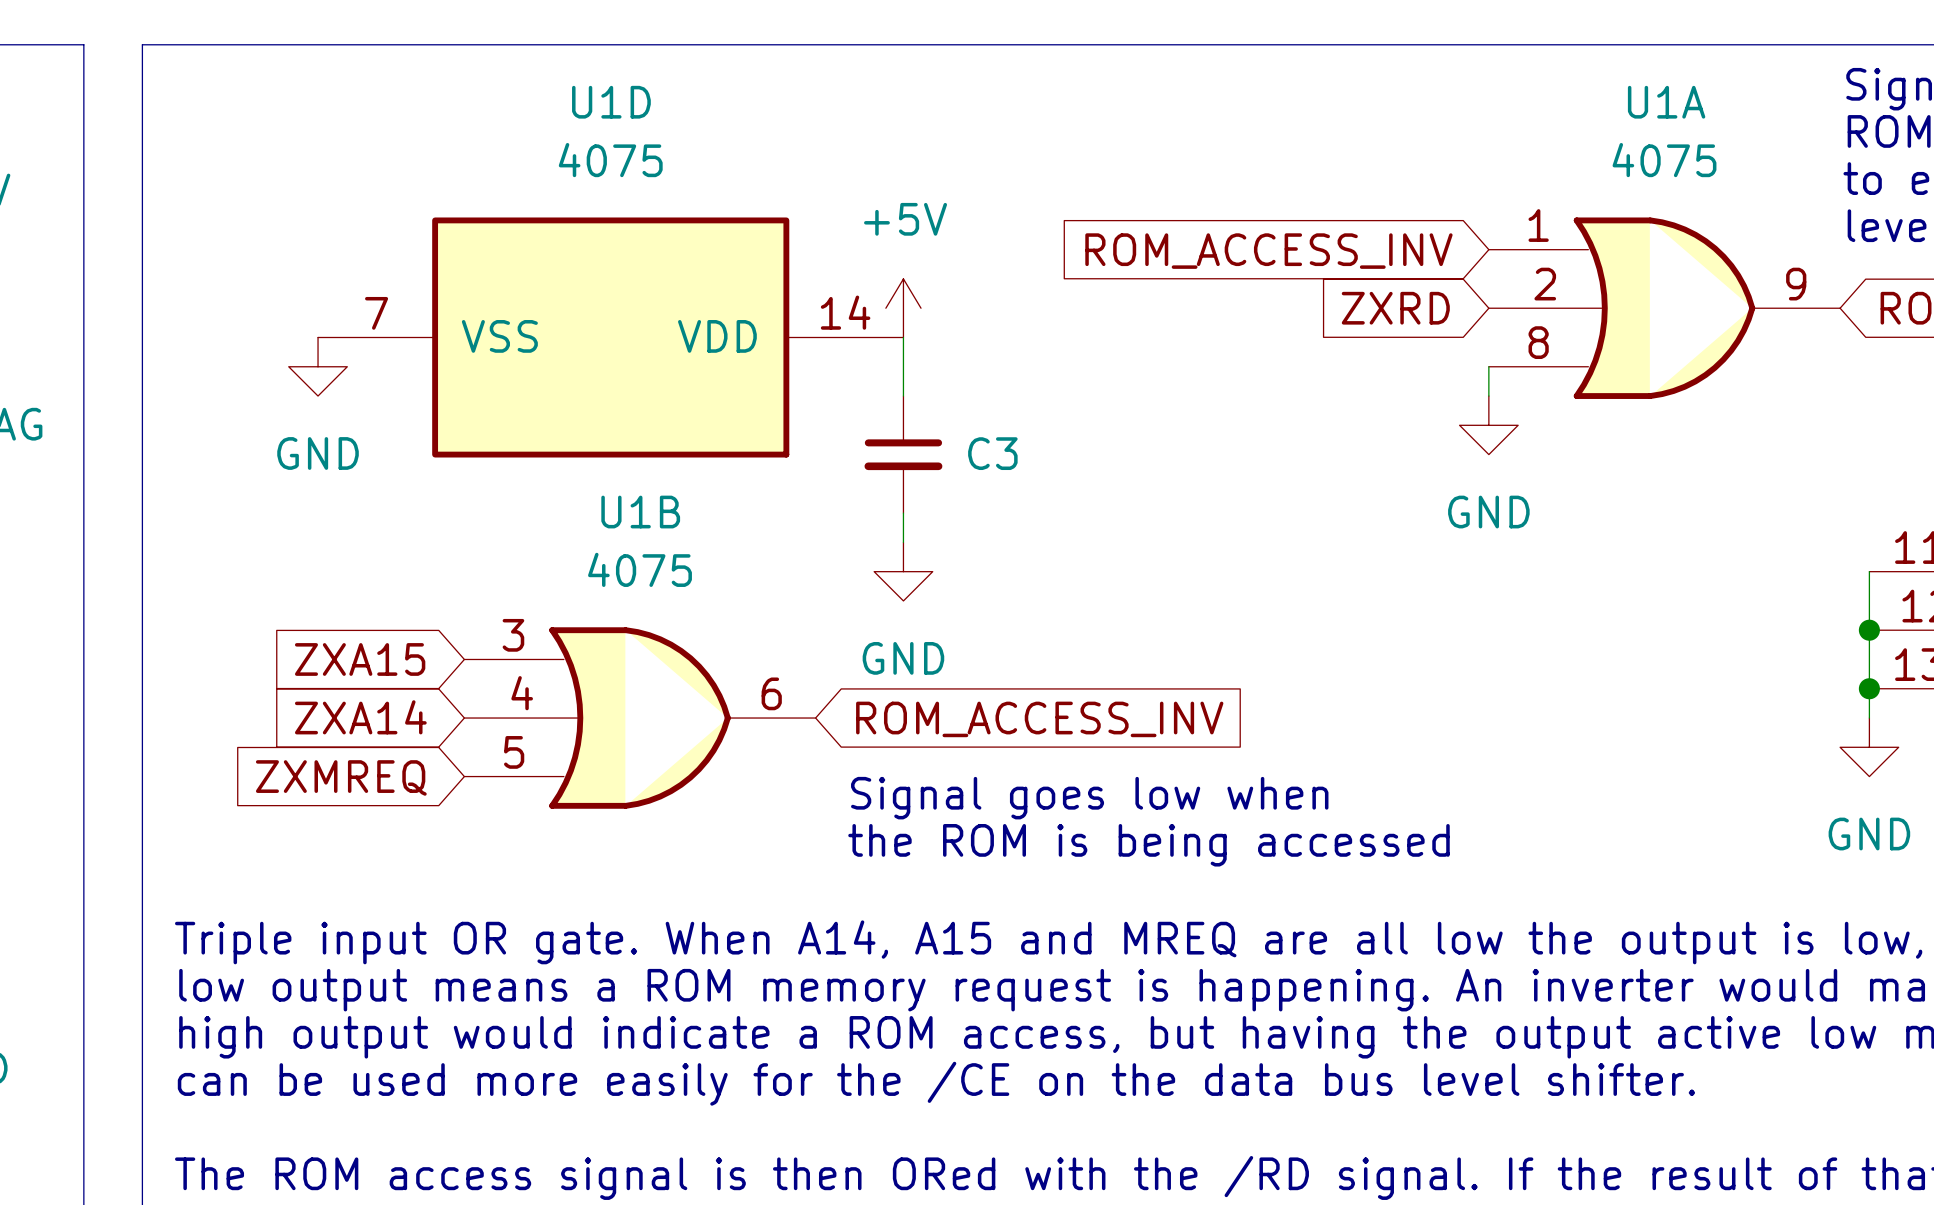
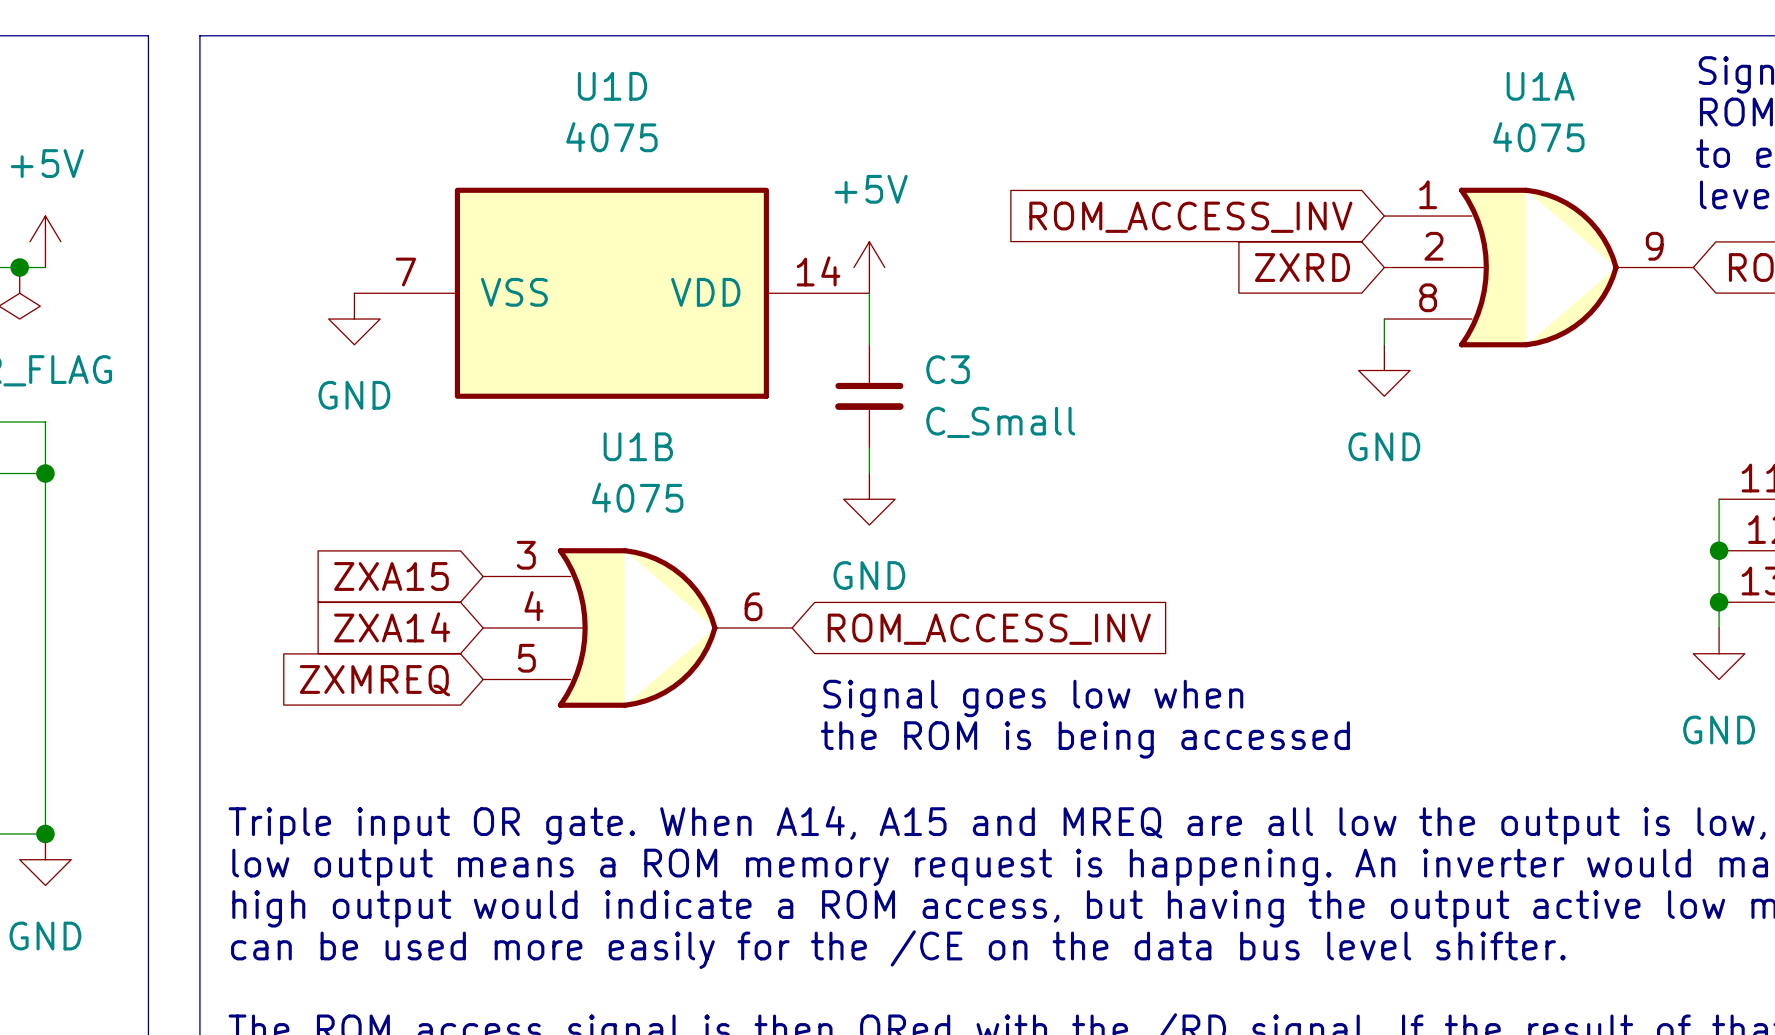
C3 name position: C3 (992, 453) -> C3 (948, 369)
C3 value: none -> C_Small (1000, 422)

